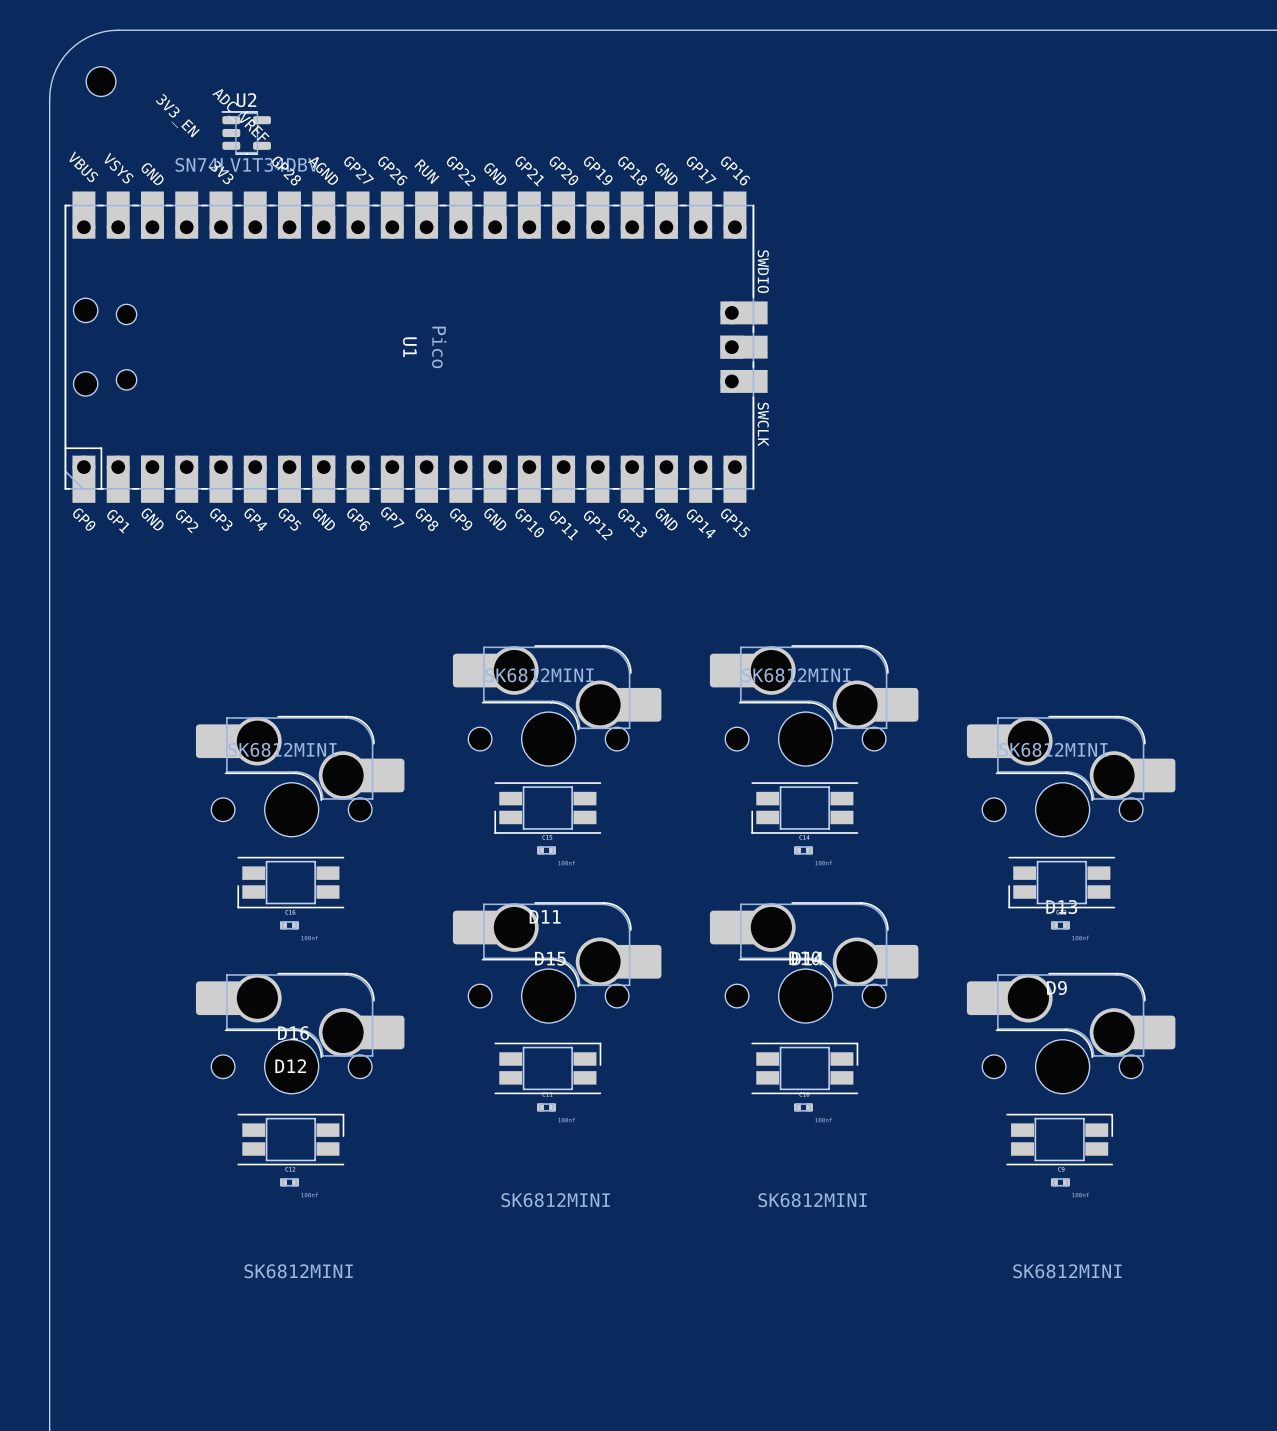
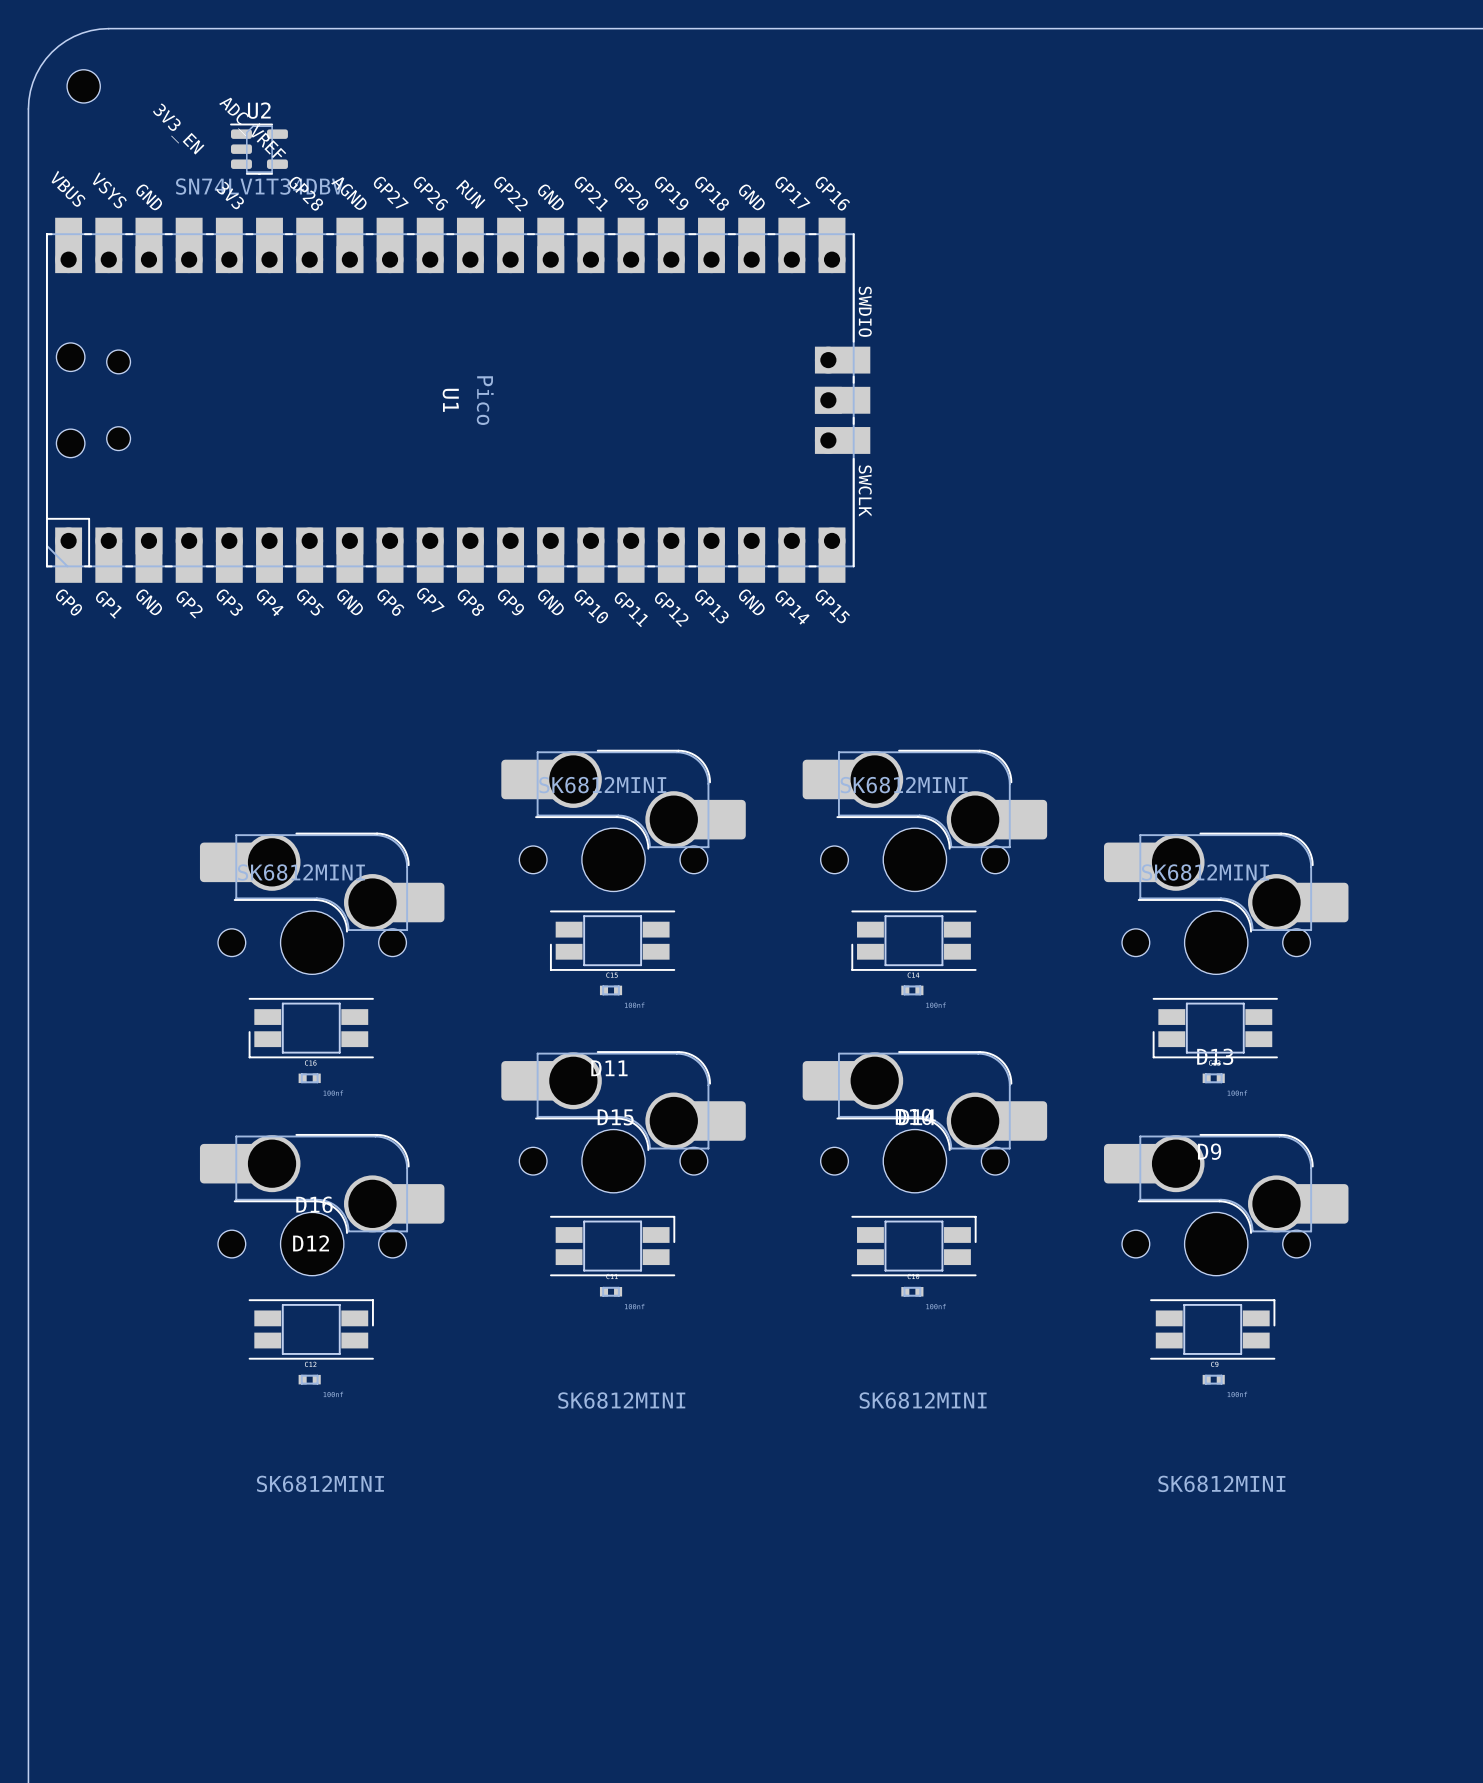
part footprint: [86, 66, 116, 97] -> [67, 69, 101, 103]

